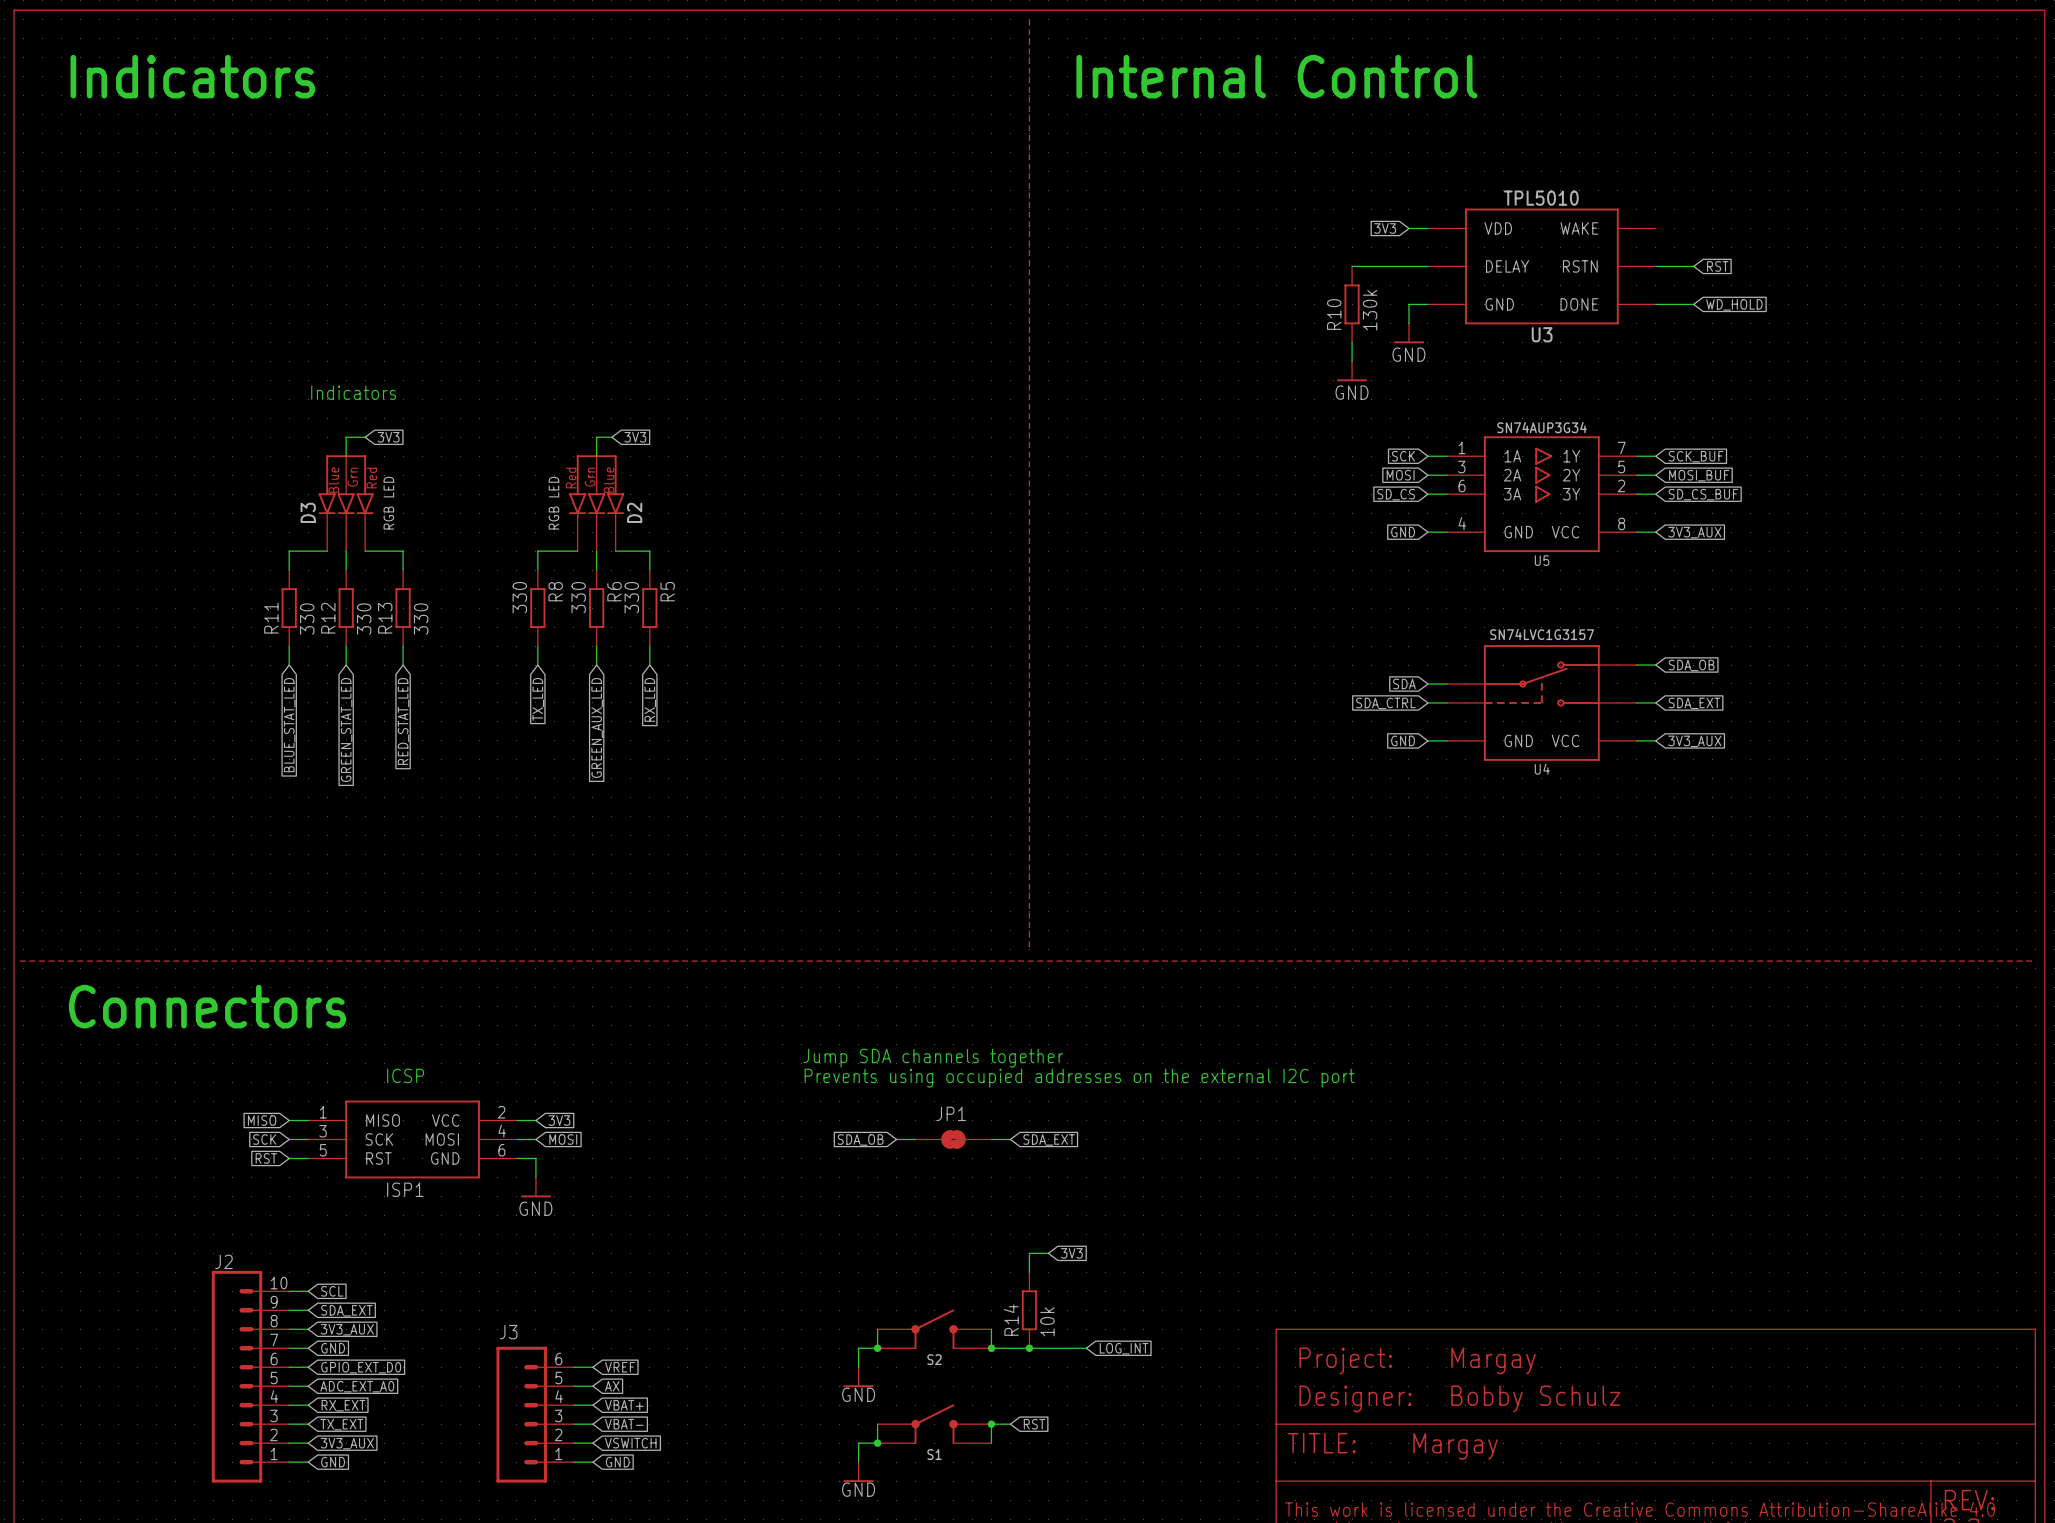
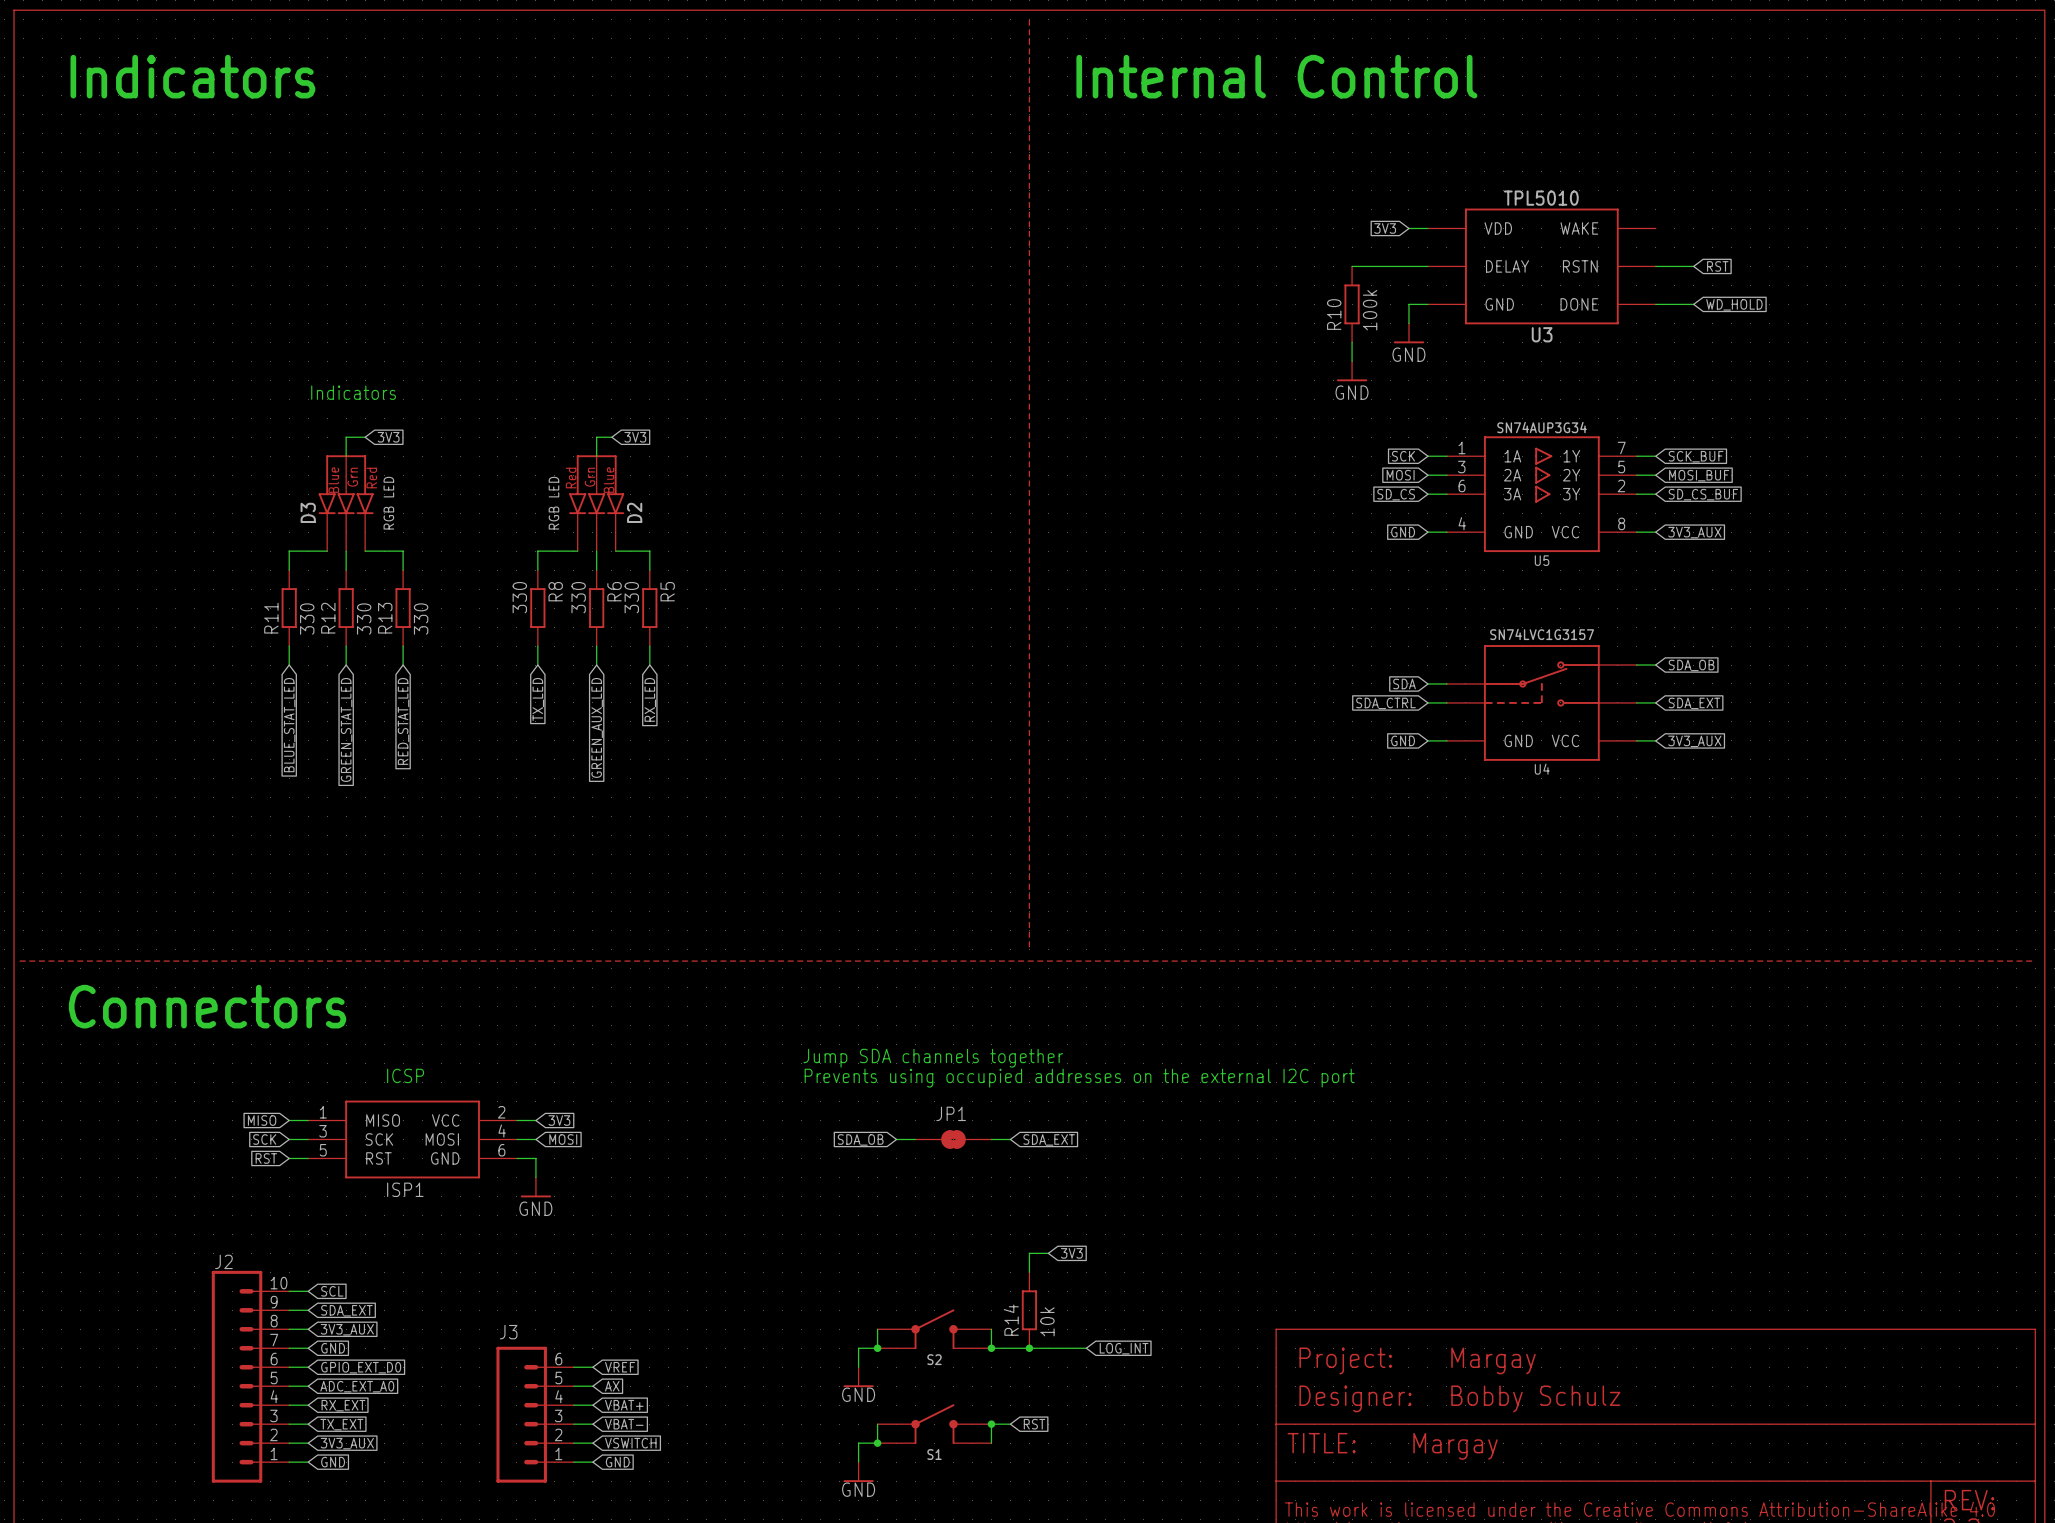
R10 value: 130k (1370, 310) -> 100k (1370, 310)

